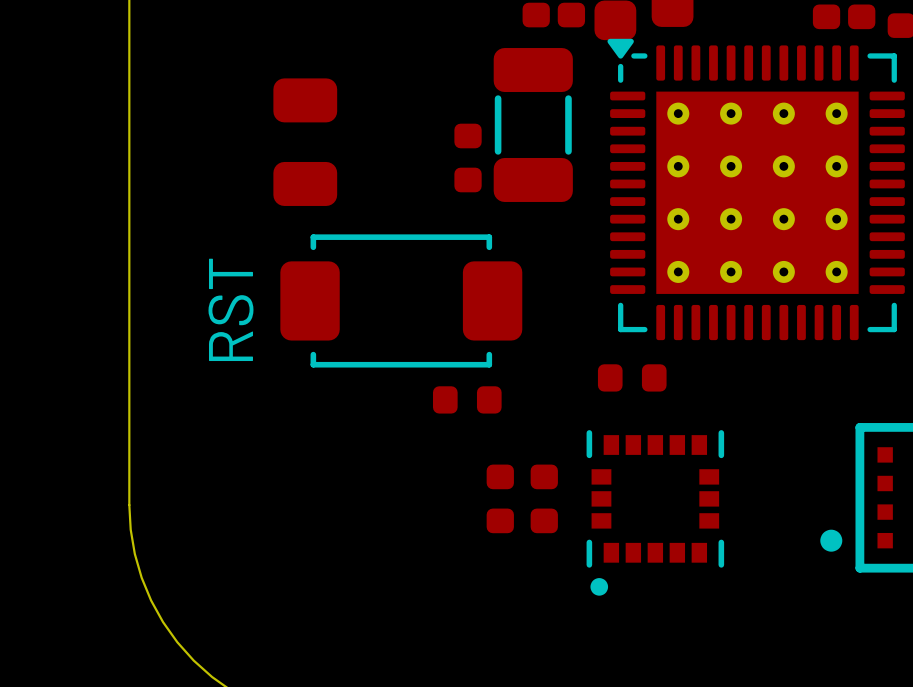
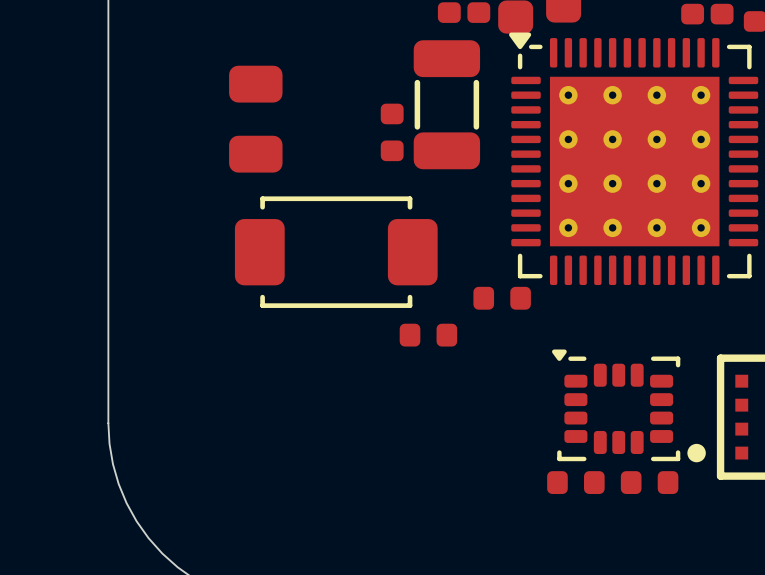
text: RST (230, 309) -> none
part position: (632, 377) -> (502, 298)
part position: (467, 399) -> (428, 335)
part: none -> (616, 405)
part: (500, 498) -> none
part: (544, 498) -> none
part: (655, 512) -> none
part: none -> (575, 482)
part: none -> (649, 482)

